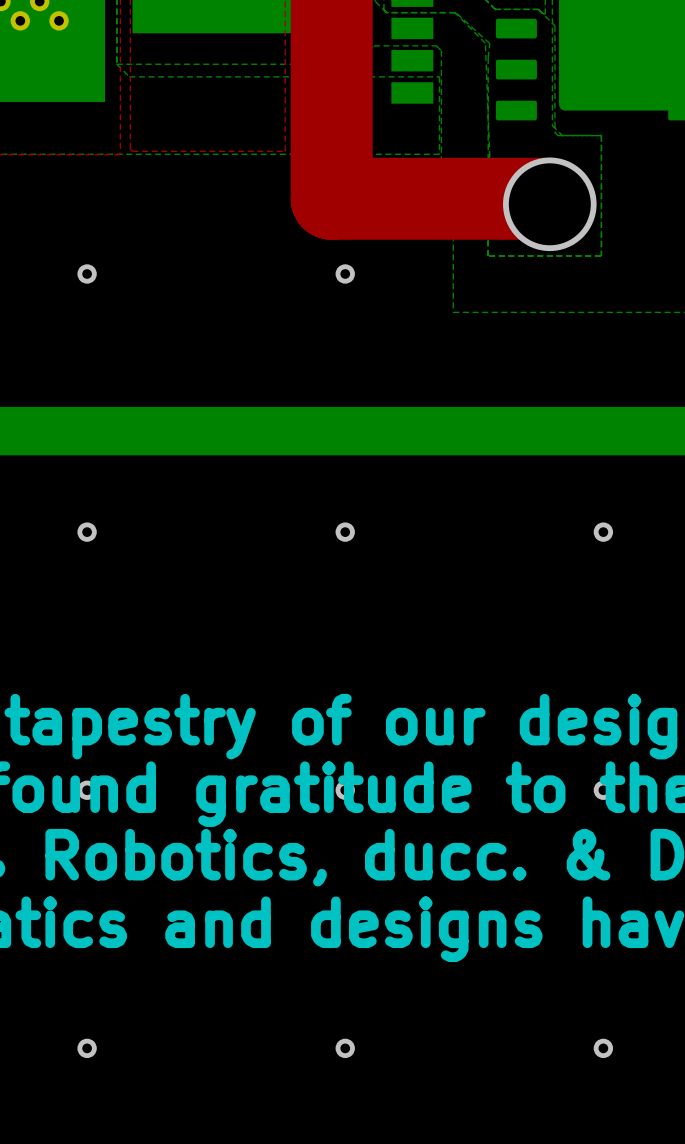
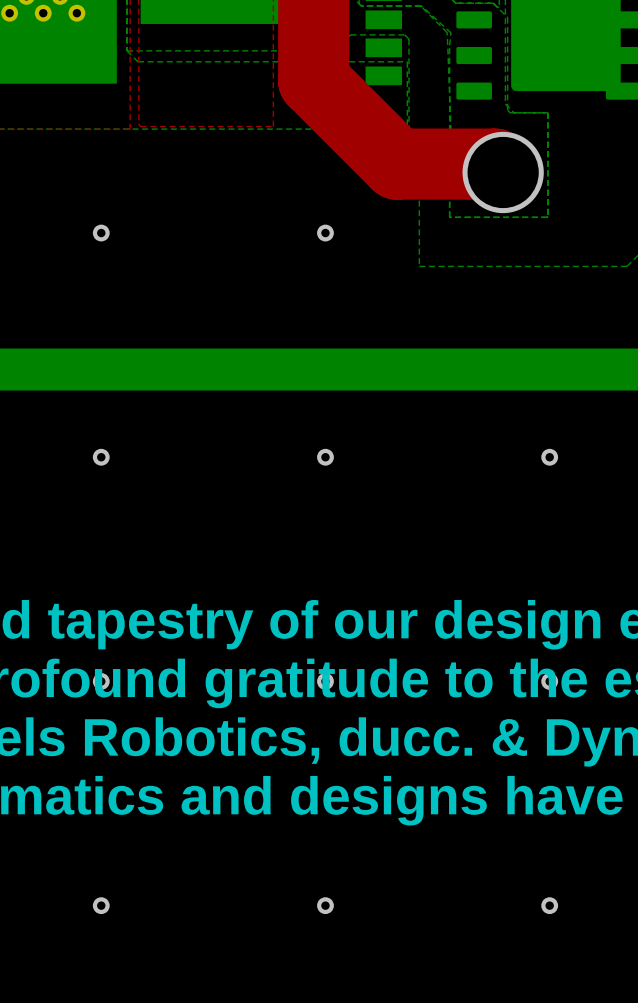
top track: (331, 98) (331, 198) (544, 198) -> (313, 80) (397, 164) (494, 164) (498, 167)

